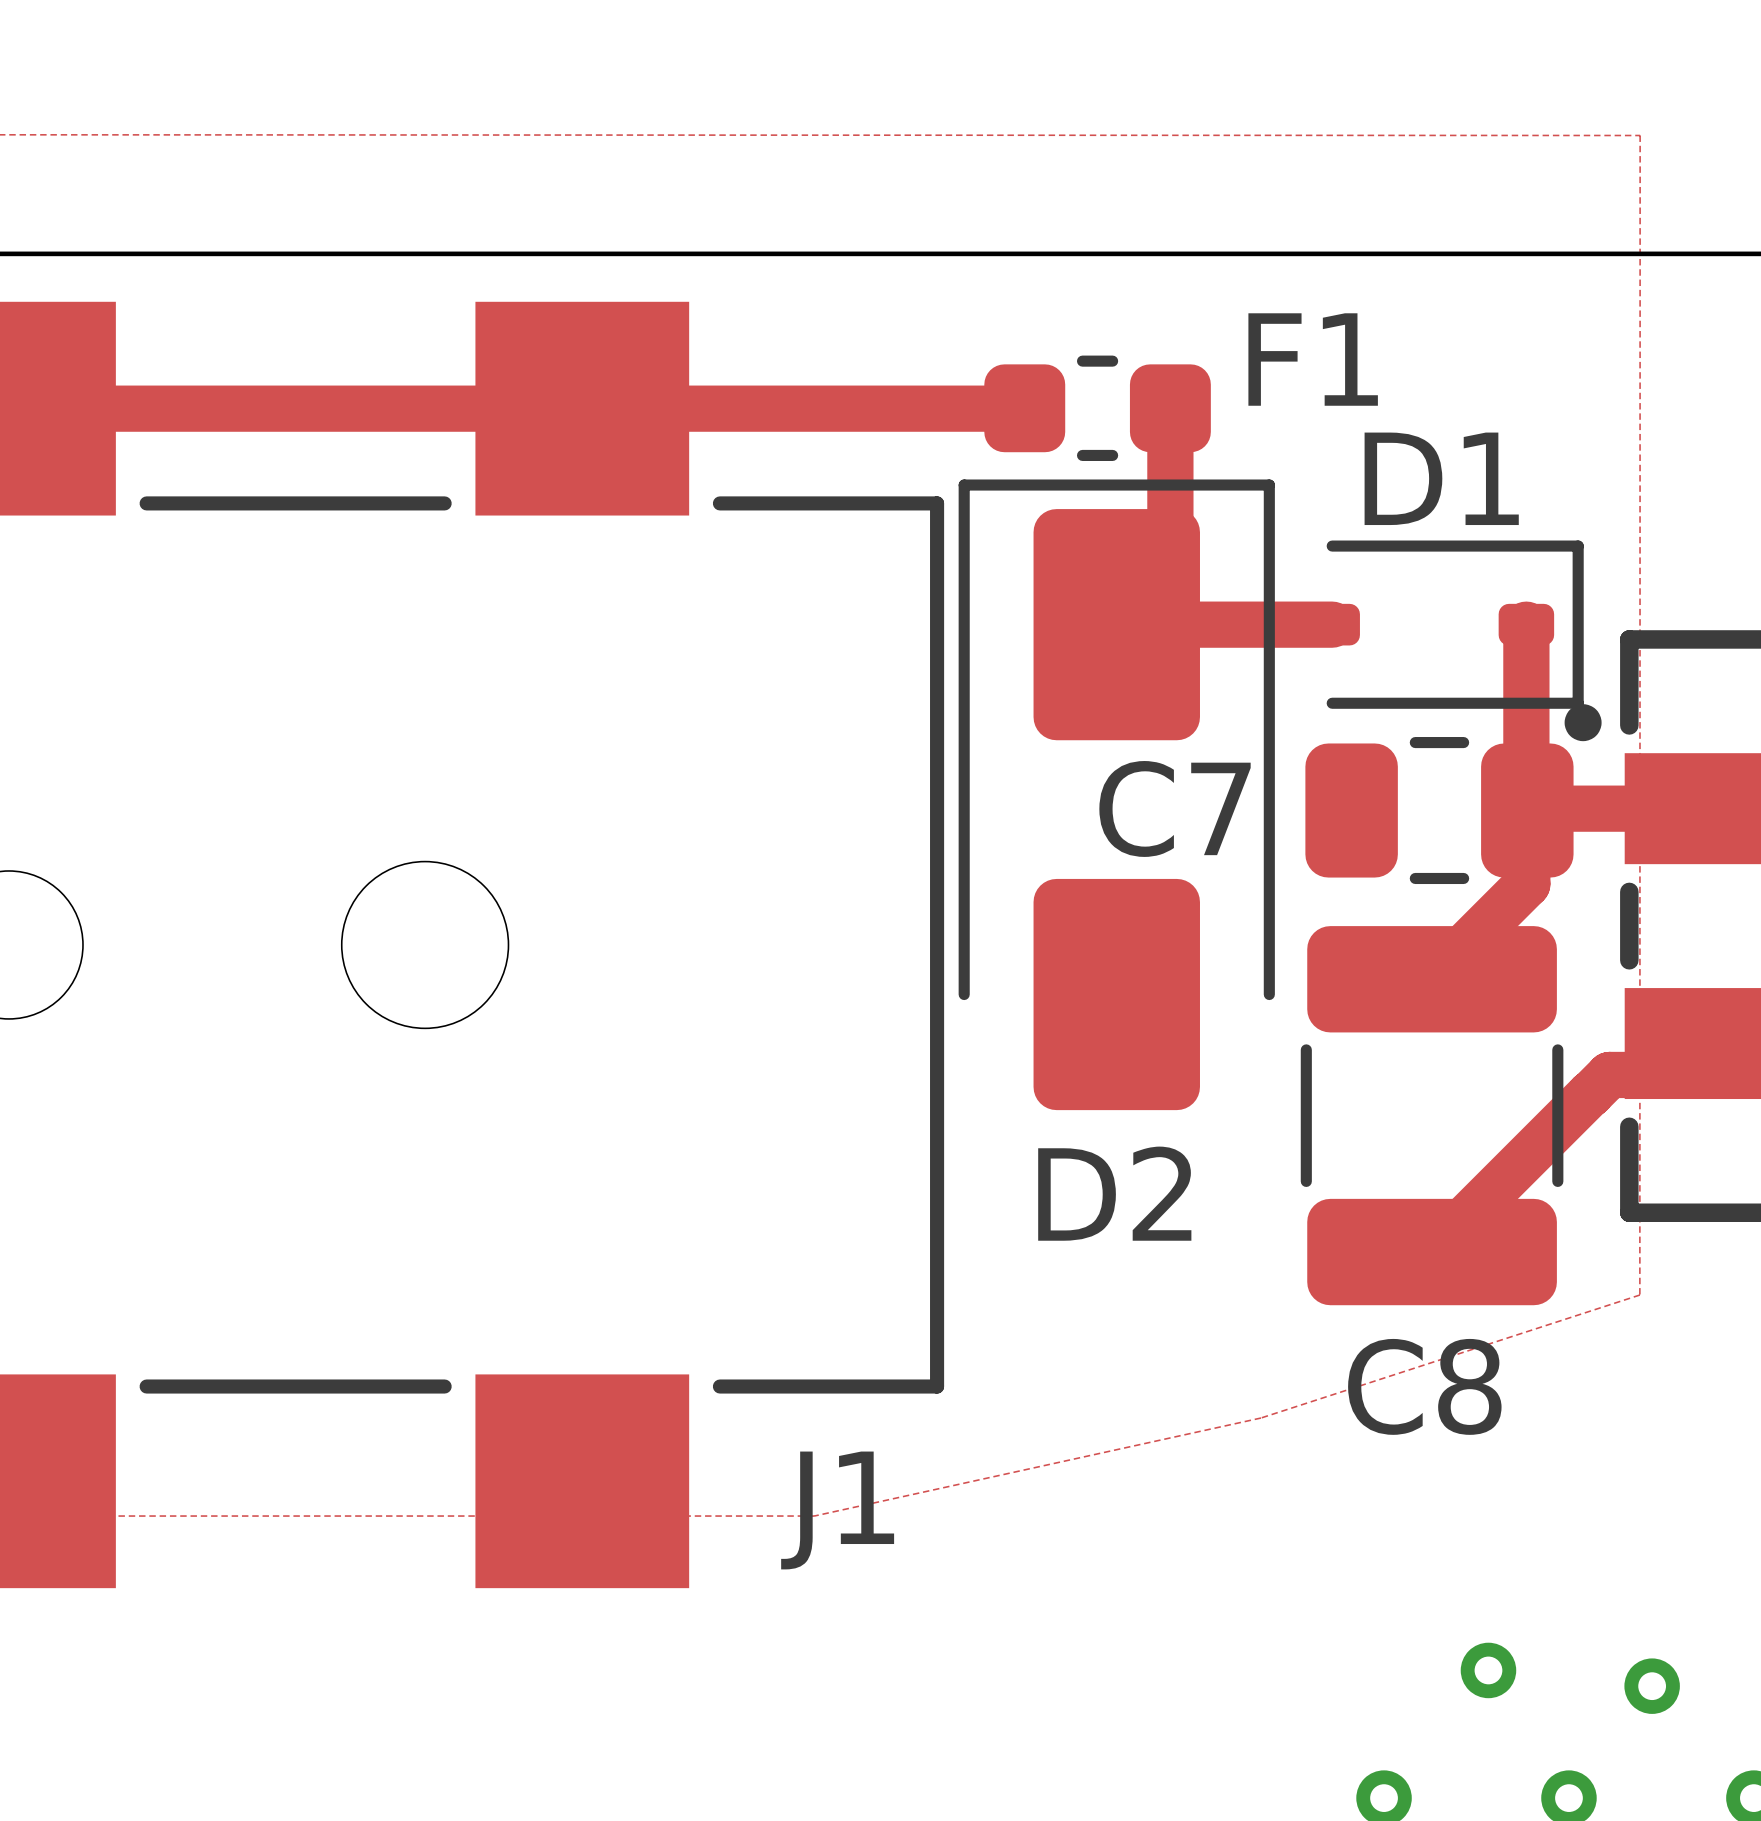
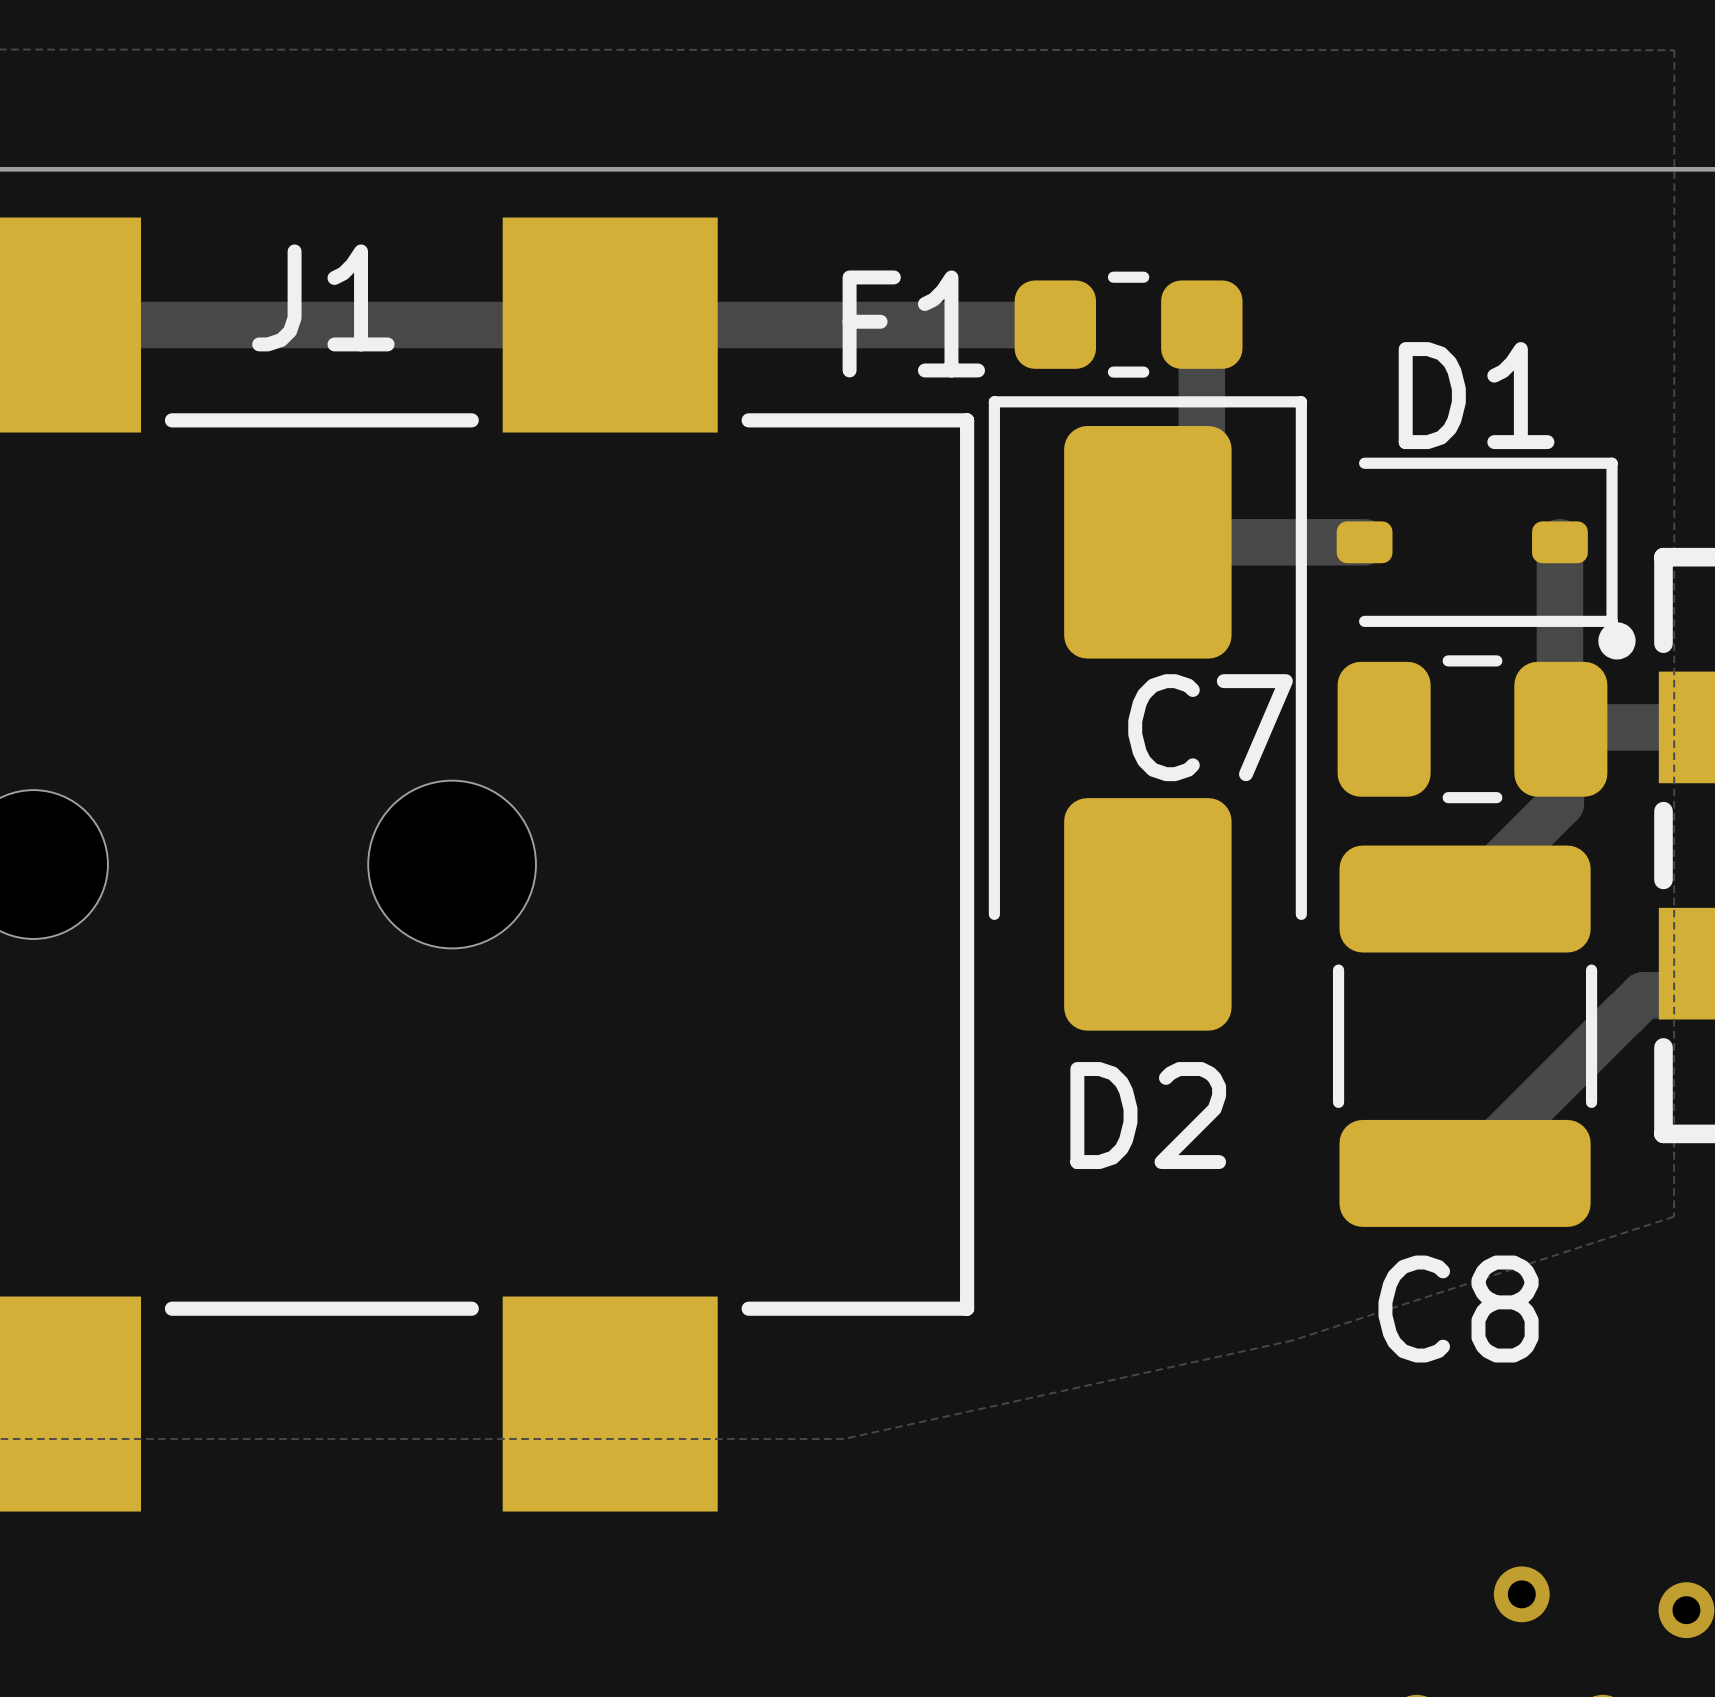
F1 name position: F1 (1313, 359) -> F1 (913, 323)
J1 name position: J1 (837, 1510) -> J1 (323, 297)

